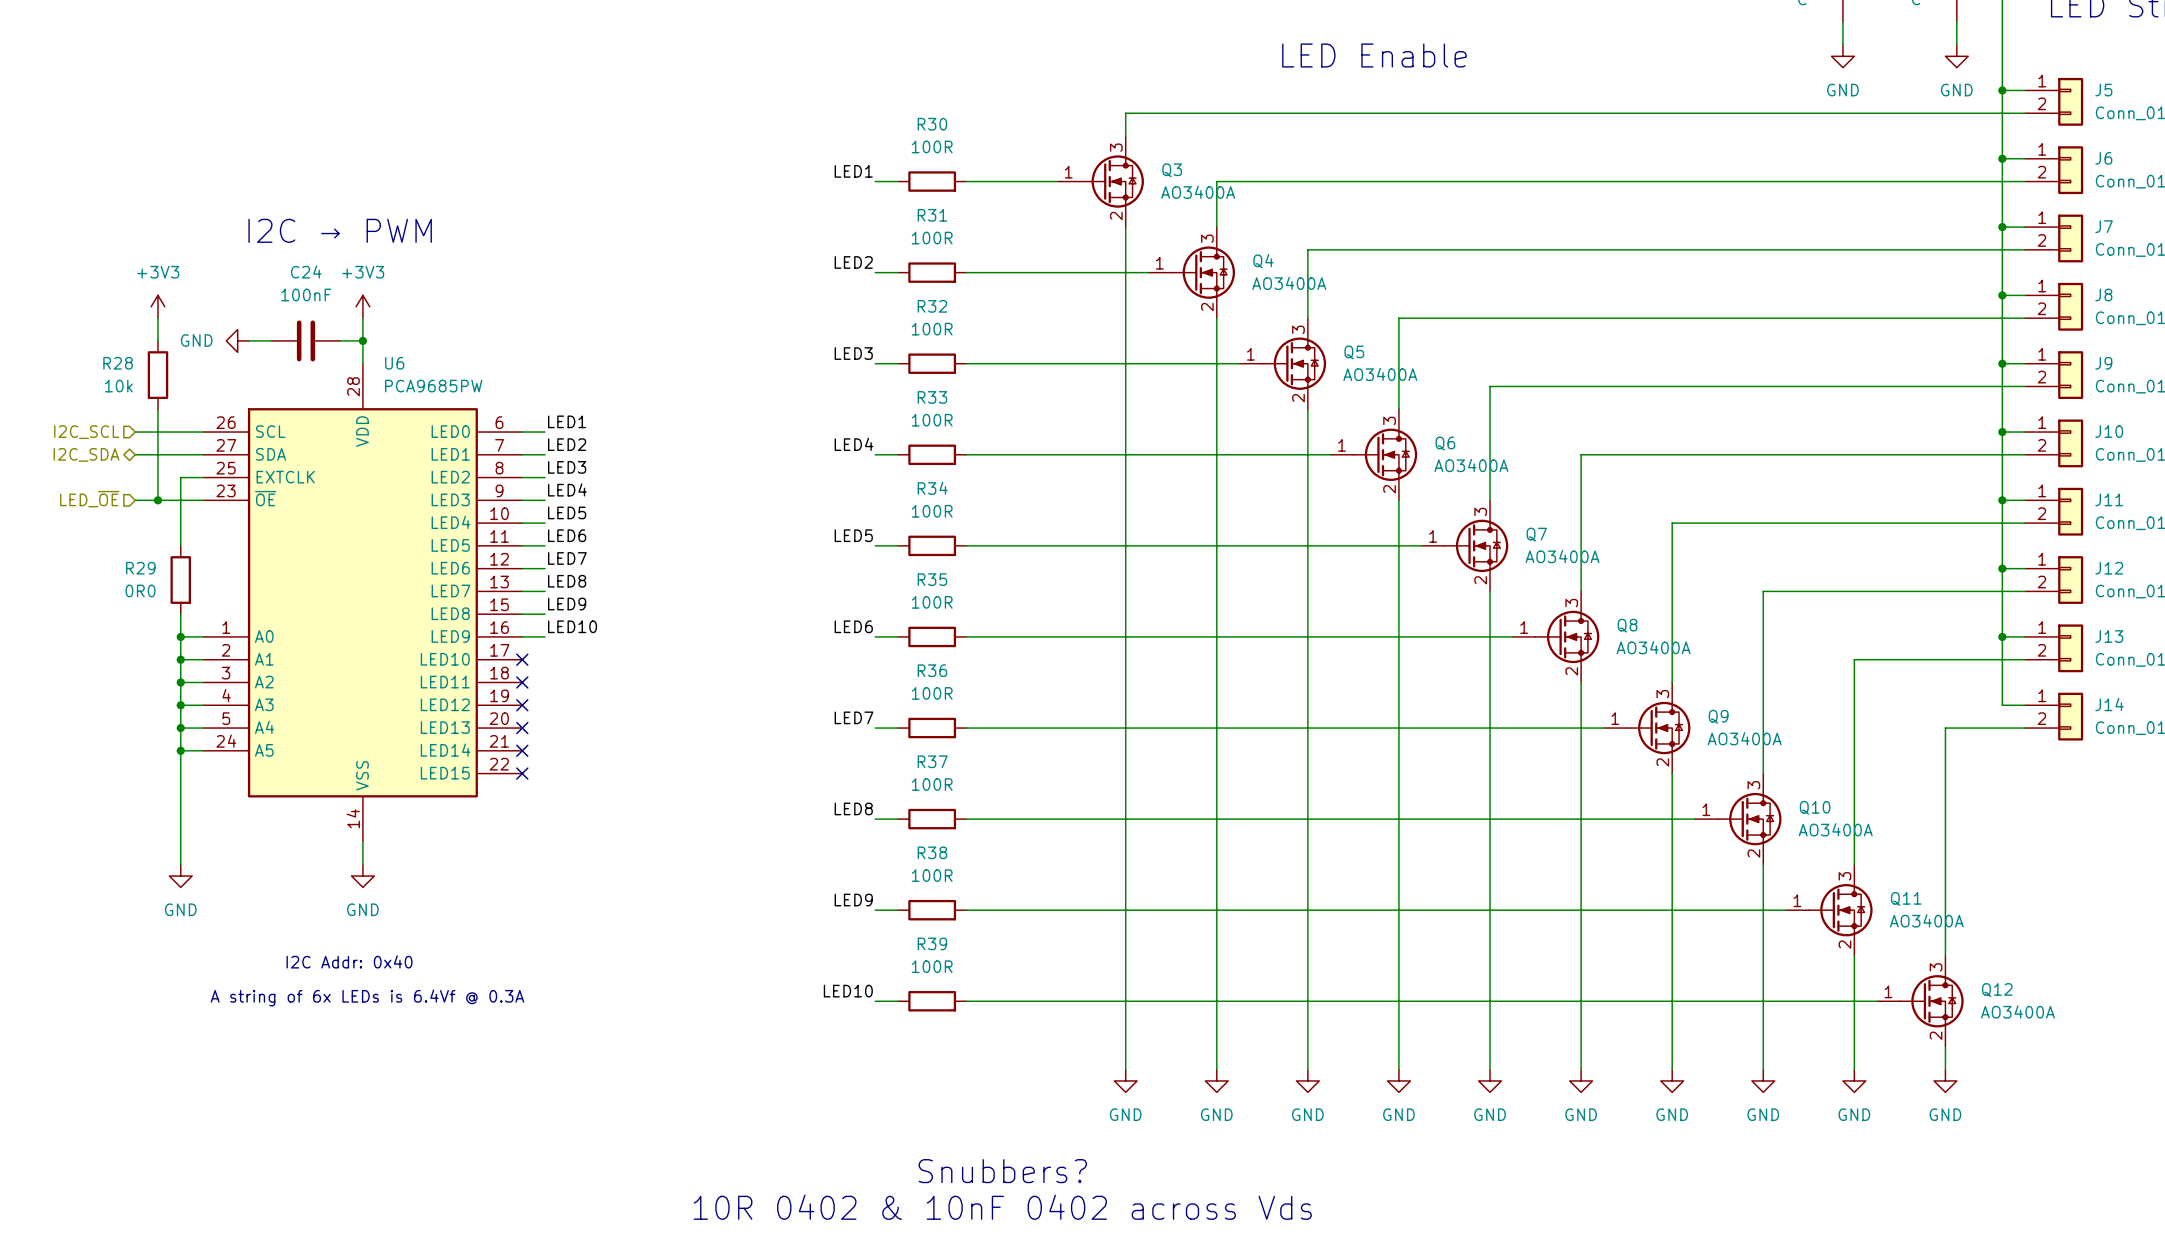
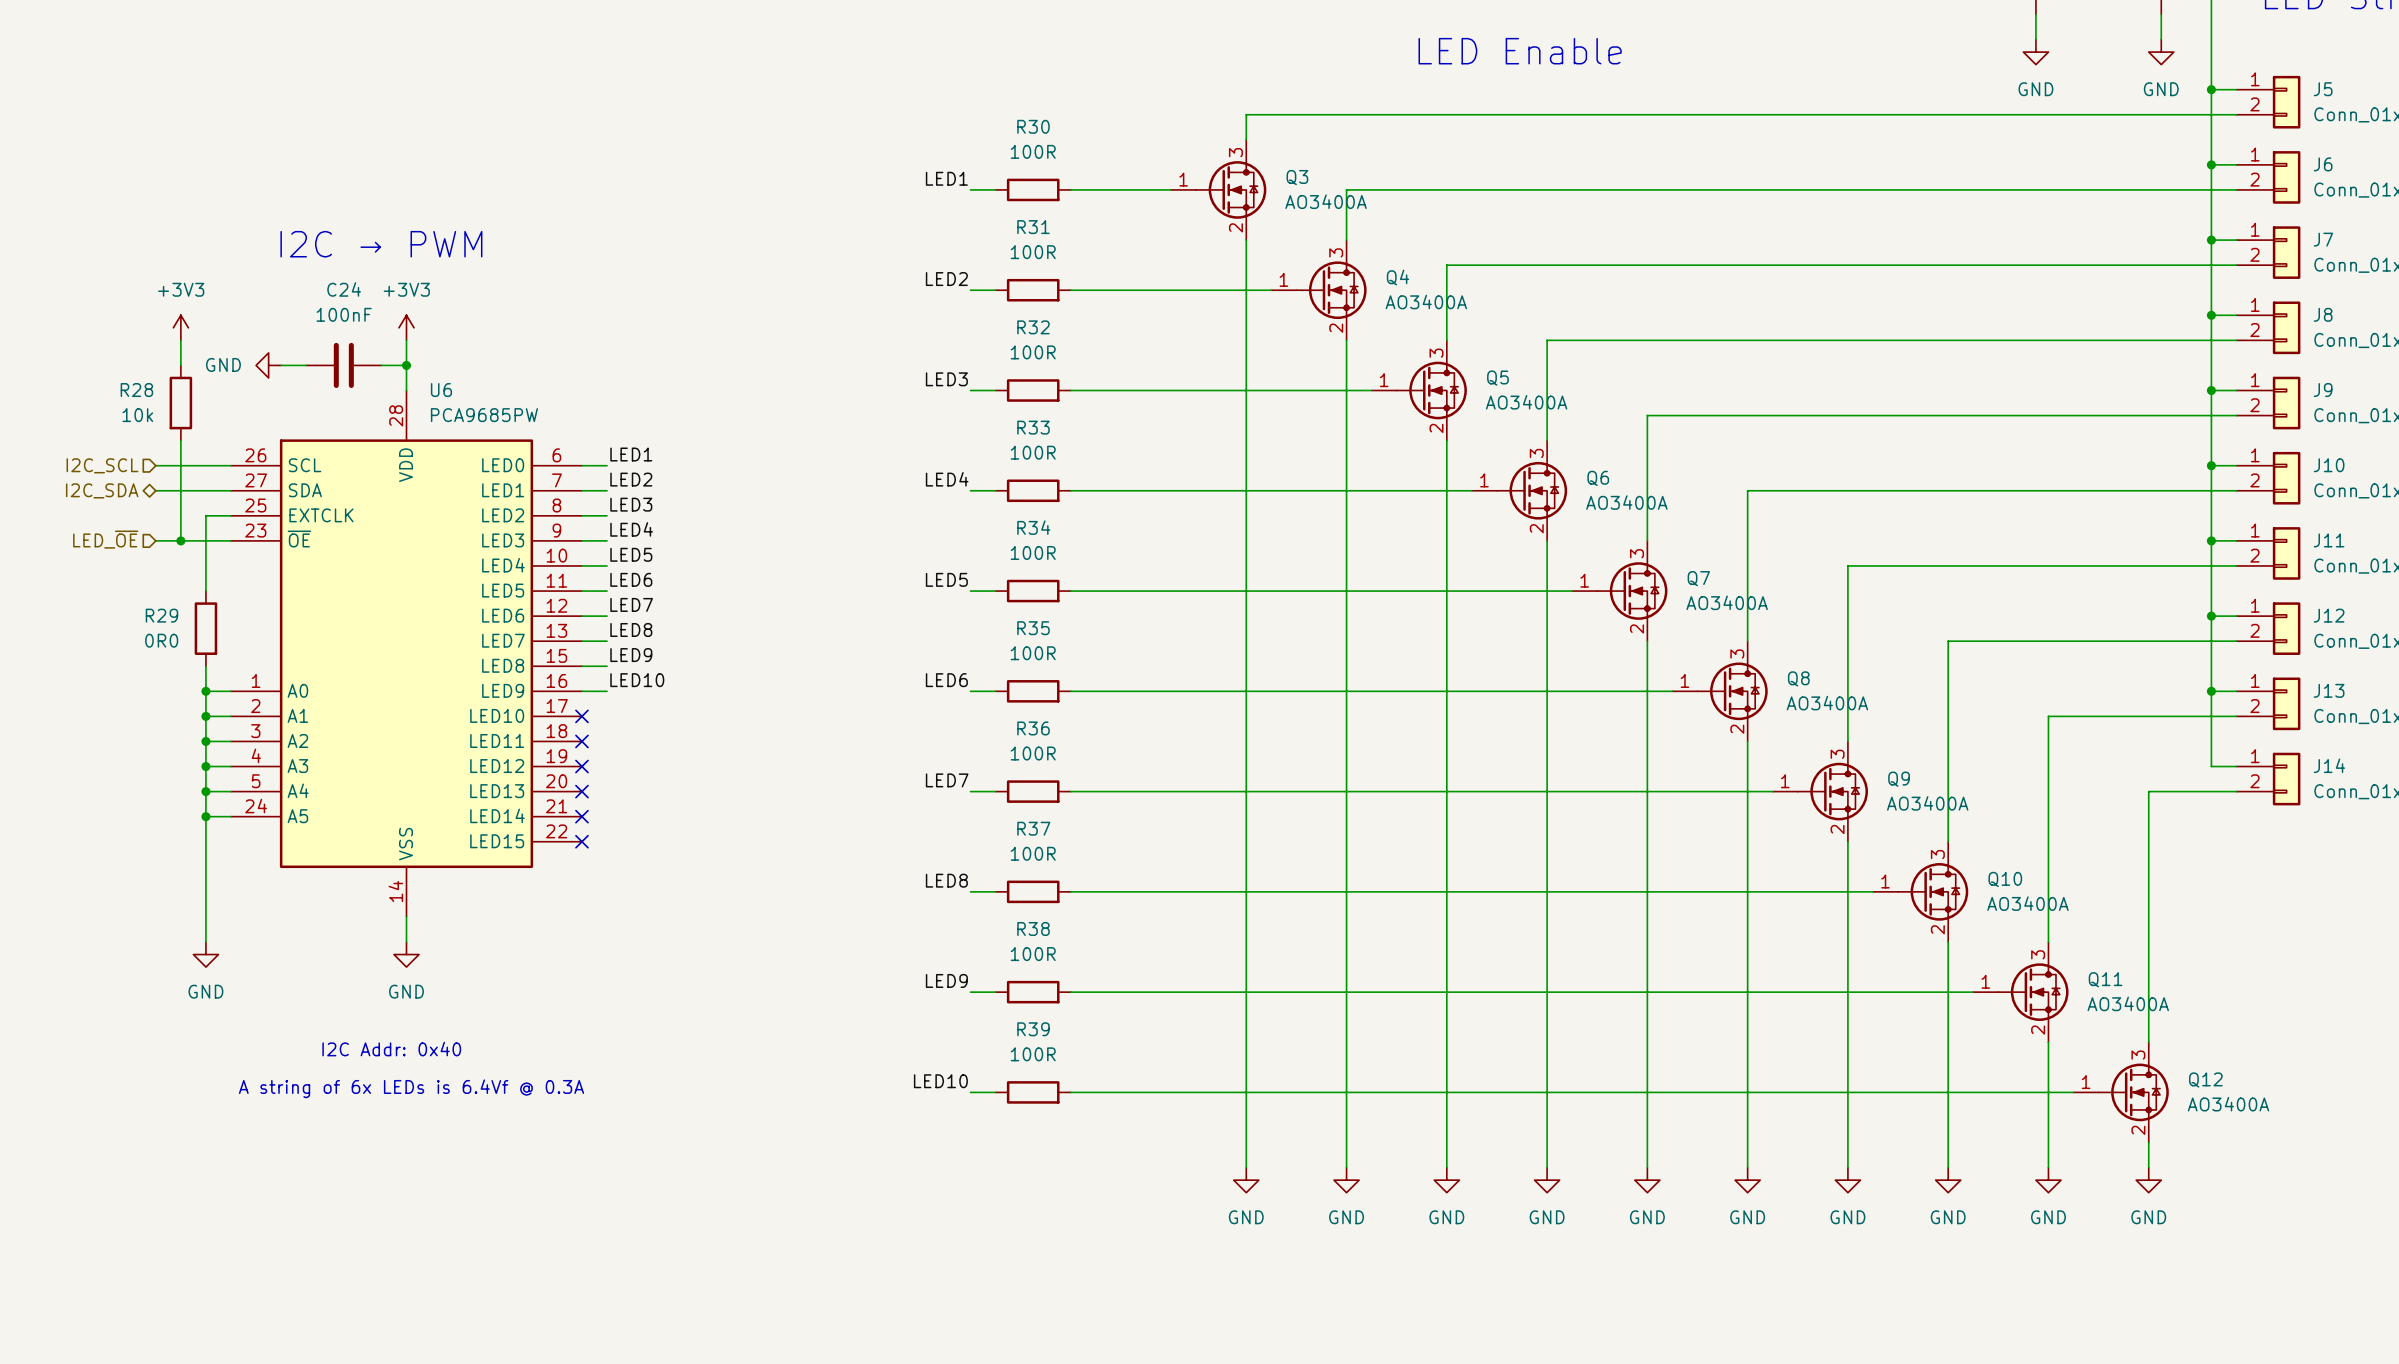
text: Snubbers? (1002, 1171) -> none
text: 10R 0402 & 10nF 0402 across Vds (1002, 1207) -> none

